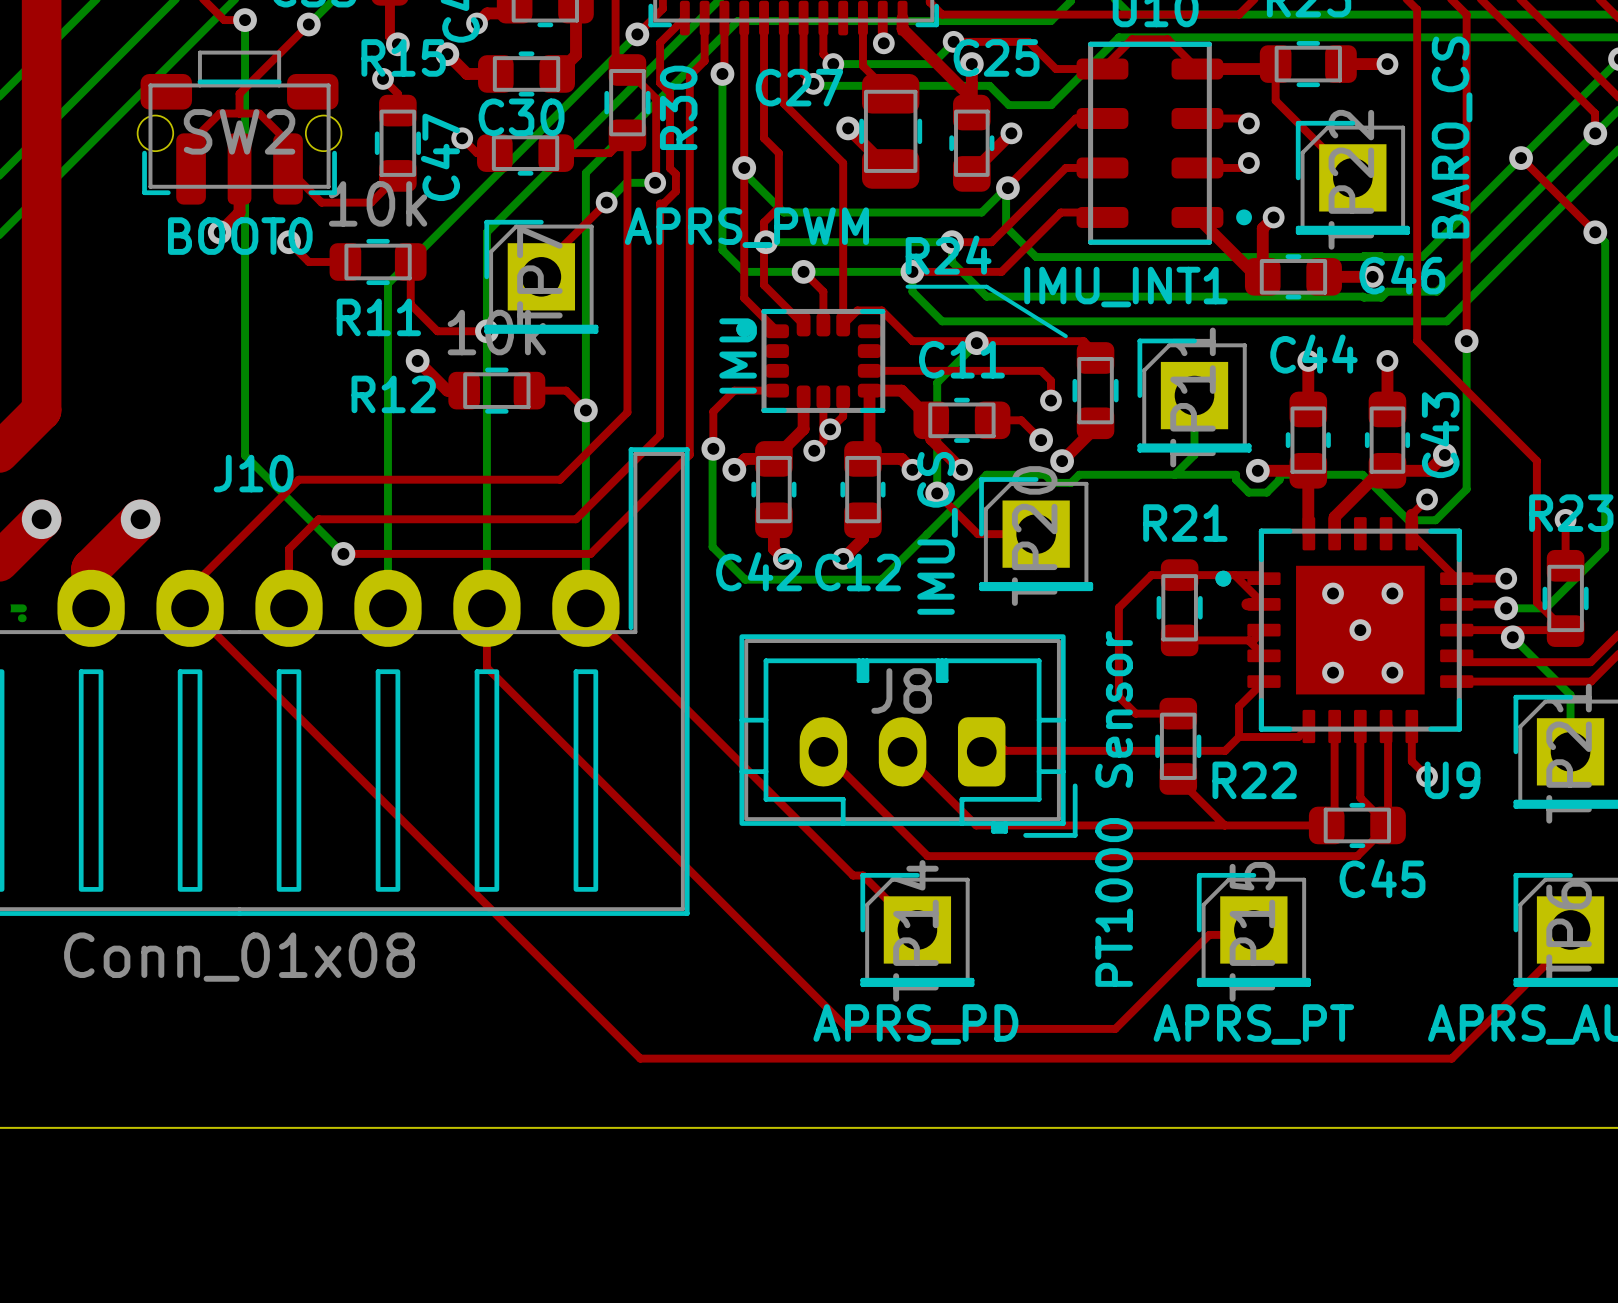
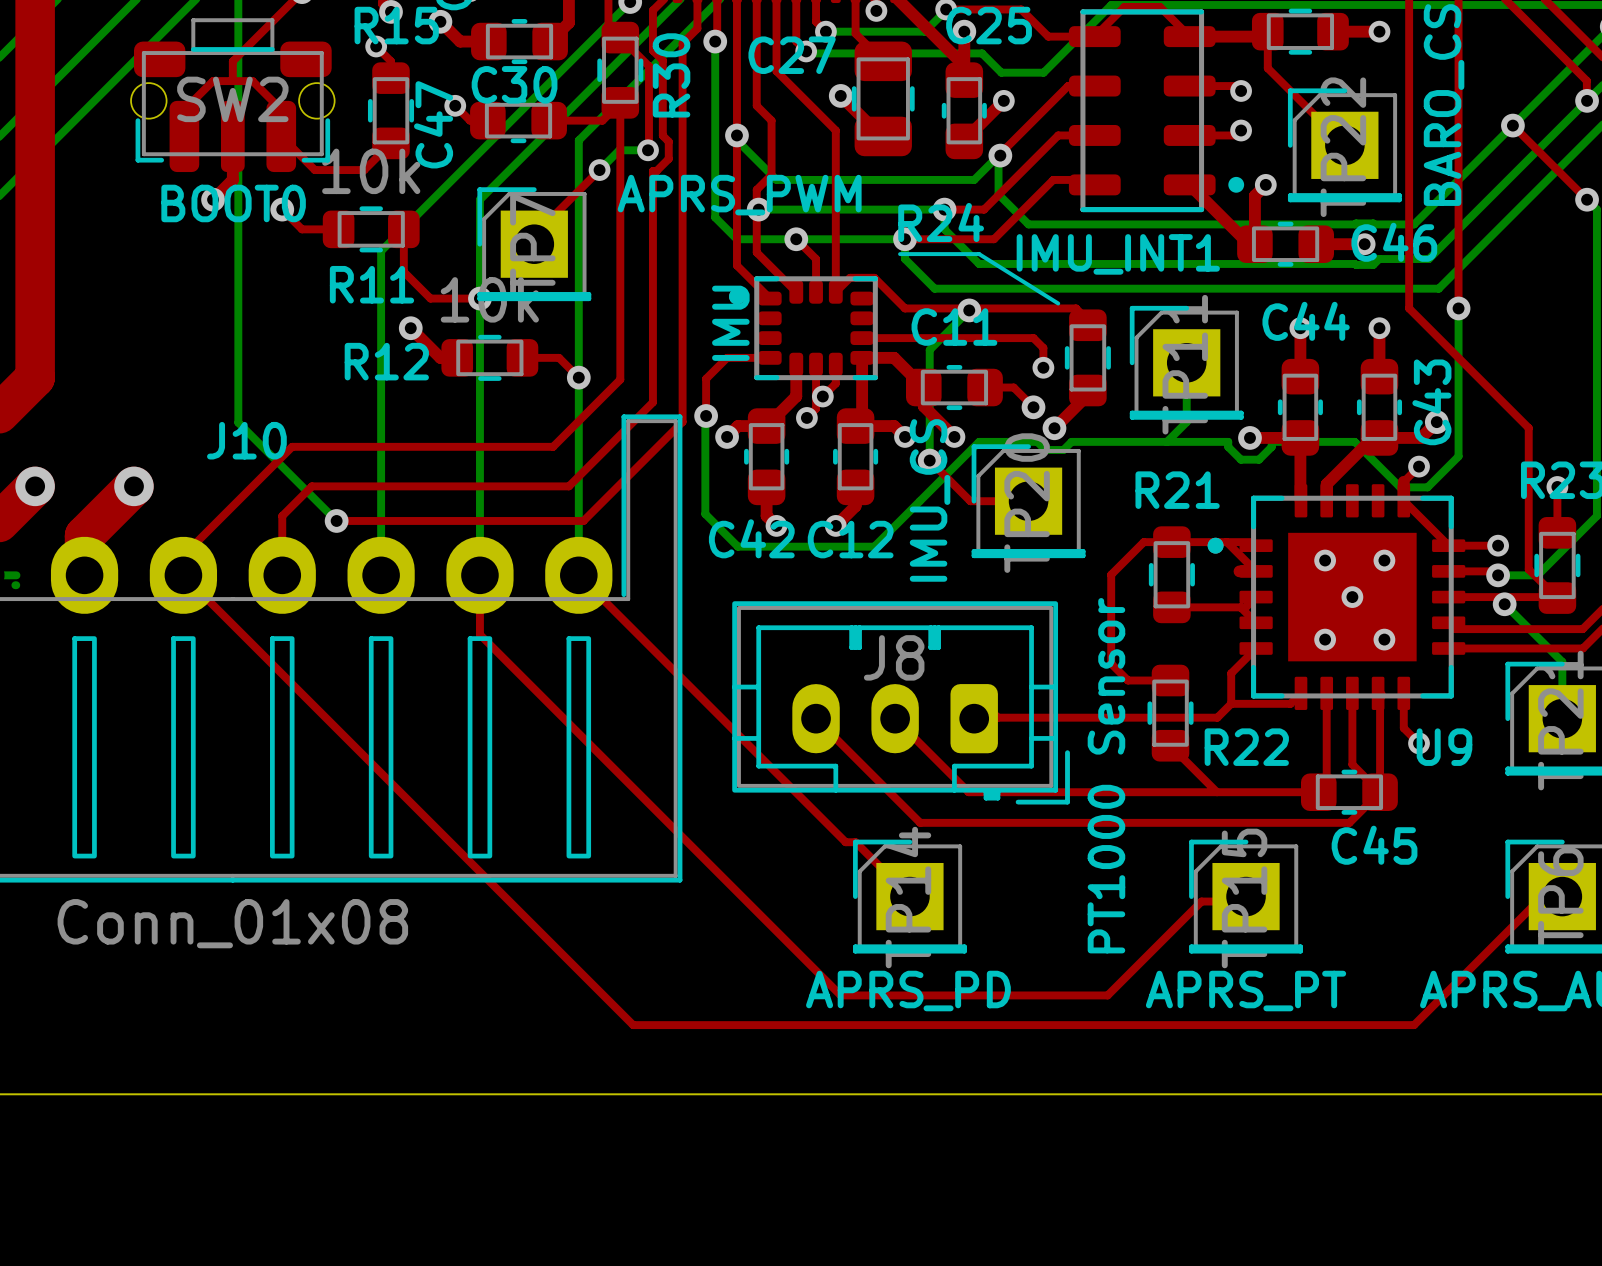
top track: (1570, 939) (1451, 1058) (1422, 1058) -> (1532, 906) (1414, 1025)

